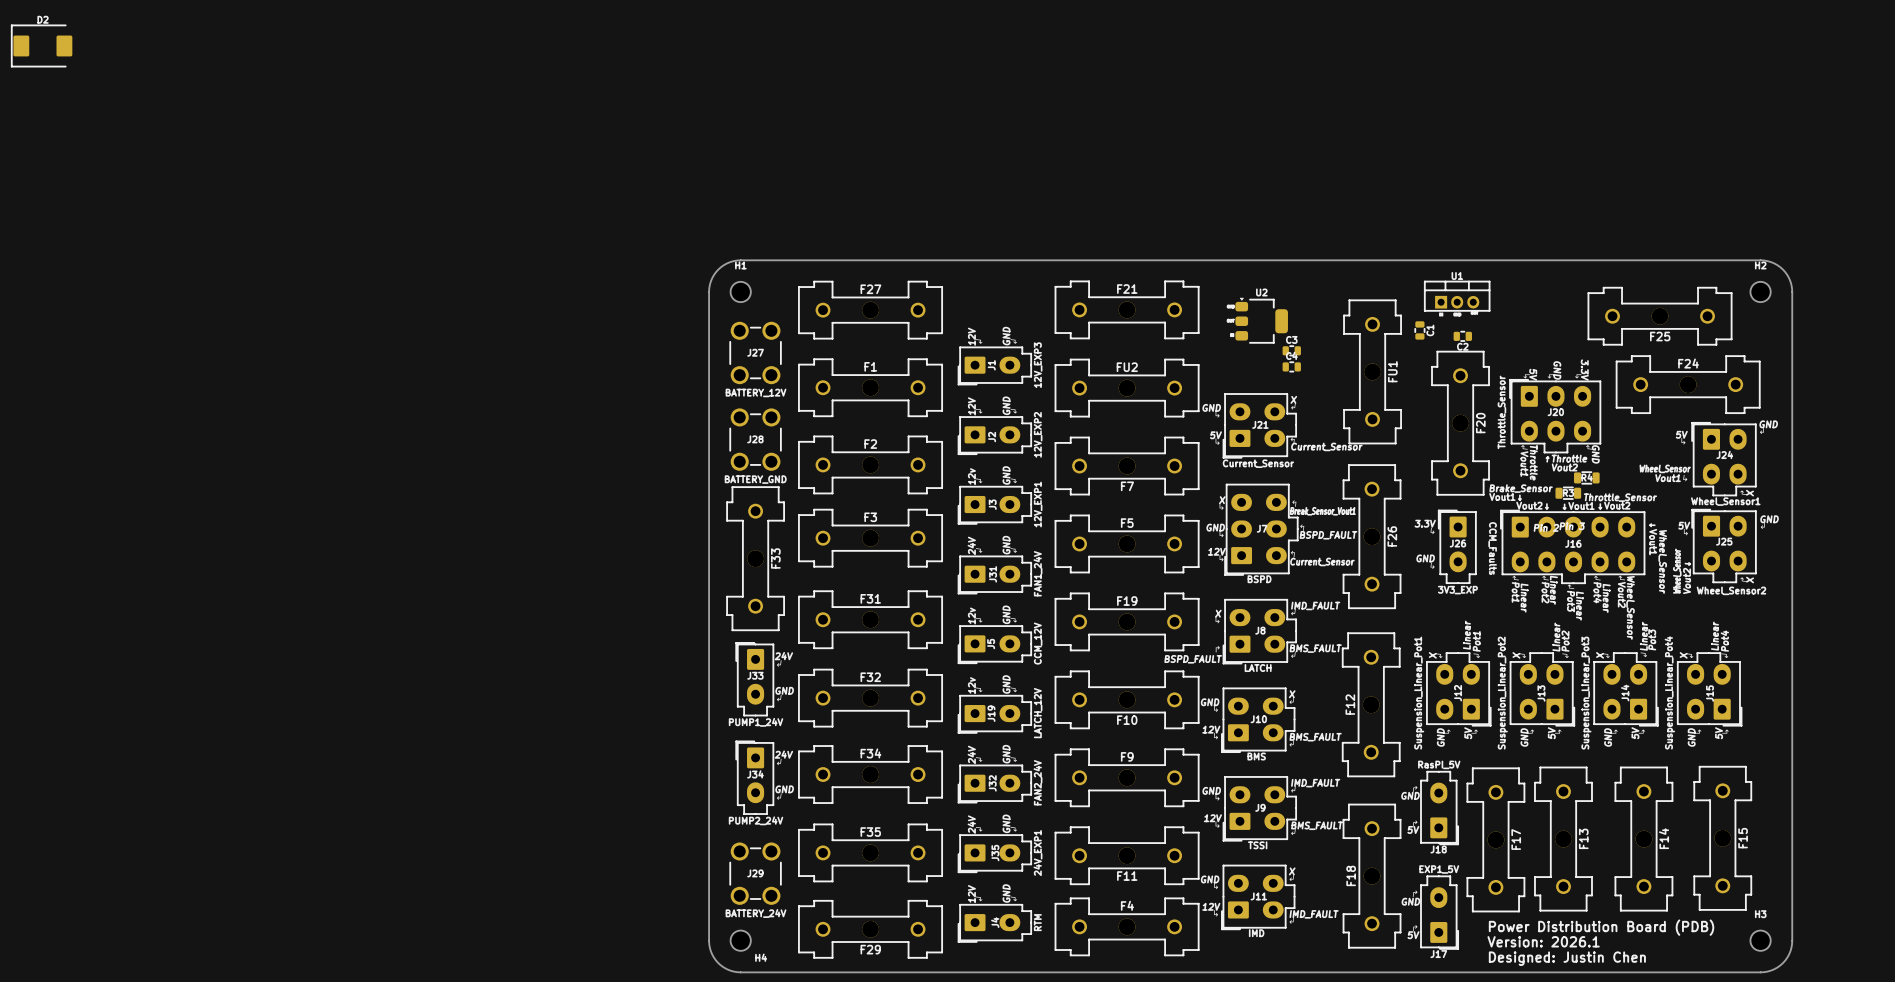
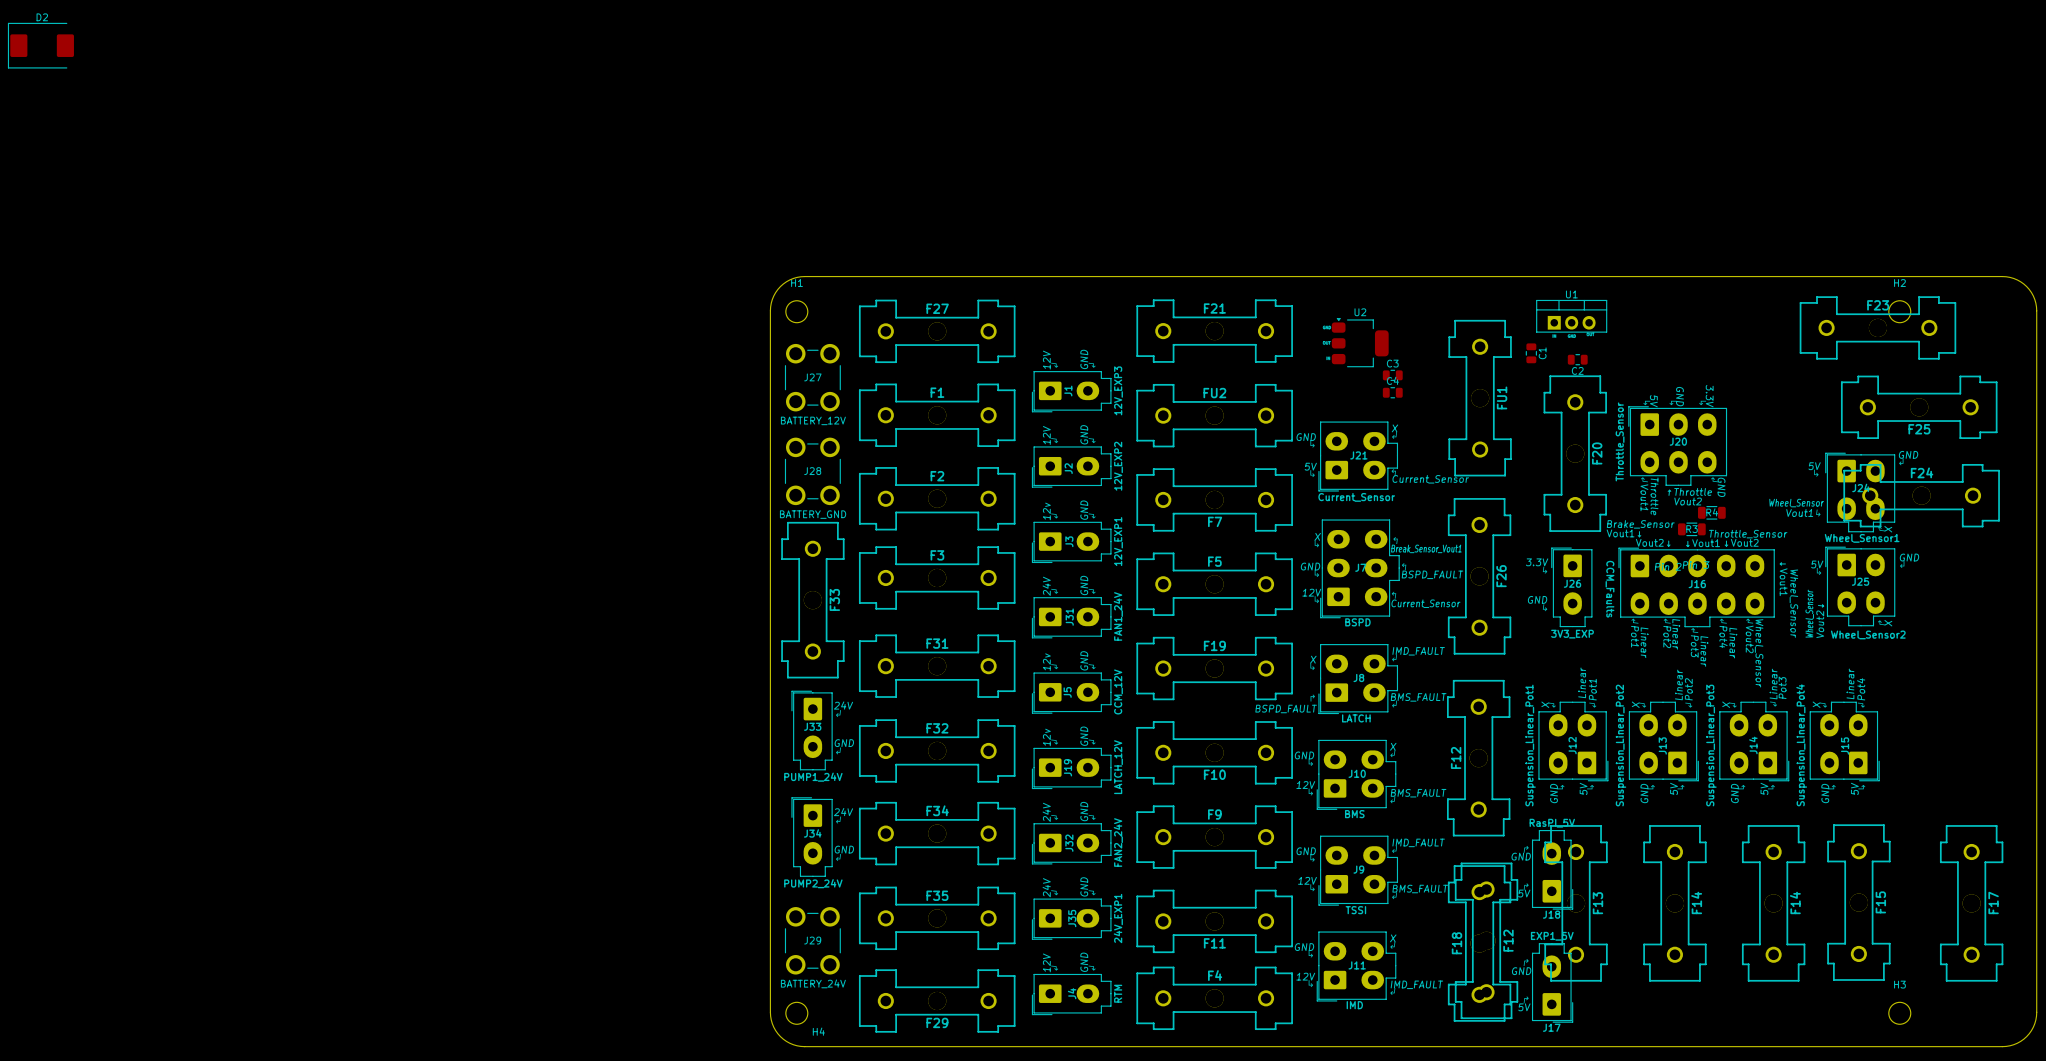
board edge: (740, 260) (1760, 260) (1777, 265) (1787, 275) (1792, 291) (1792, 940) (1787, 957) (1777, 967) (1760, 972) (740, 972) (723, 967) (713, 957) (709, 940) (709, 291) (710, 281) (718, 269) (730, 262) (740, 260) -> (804, 276) (793, 278) (780, 286) (773, 295) (770, 310) (770, 1012) (775, 1030) (786, 1041) (804, 1046) (2002, 1046) (2020, 1041) (2031, 1030) (2036, 1012) (2036, 310) (2033, 295) (2020, 281) (2002, 276) (804, 276)
F23: none -> (1877, 327)
F25 position: (1660, 316) -> (1919, 407)
F24 position: (1688, 384) -> (1921, 495)
F17 position: (1495, 839) -> (1971, 903)
F14: none -> (1674, 903)
F13 position: (1563, 839) -> (1576, 903)
F12: none -> (1486, 940)
text: Power Distribution Board (PDB) (1601, 927) -> none
text: Version: 2026.1 (1543, 941) -> none
text: Designed: Justin Chen (1567, 958) -> none

